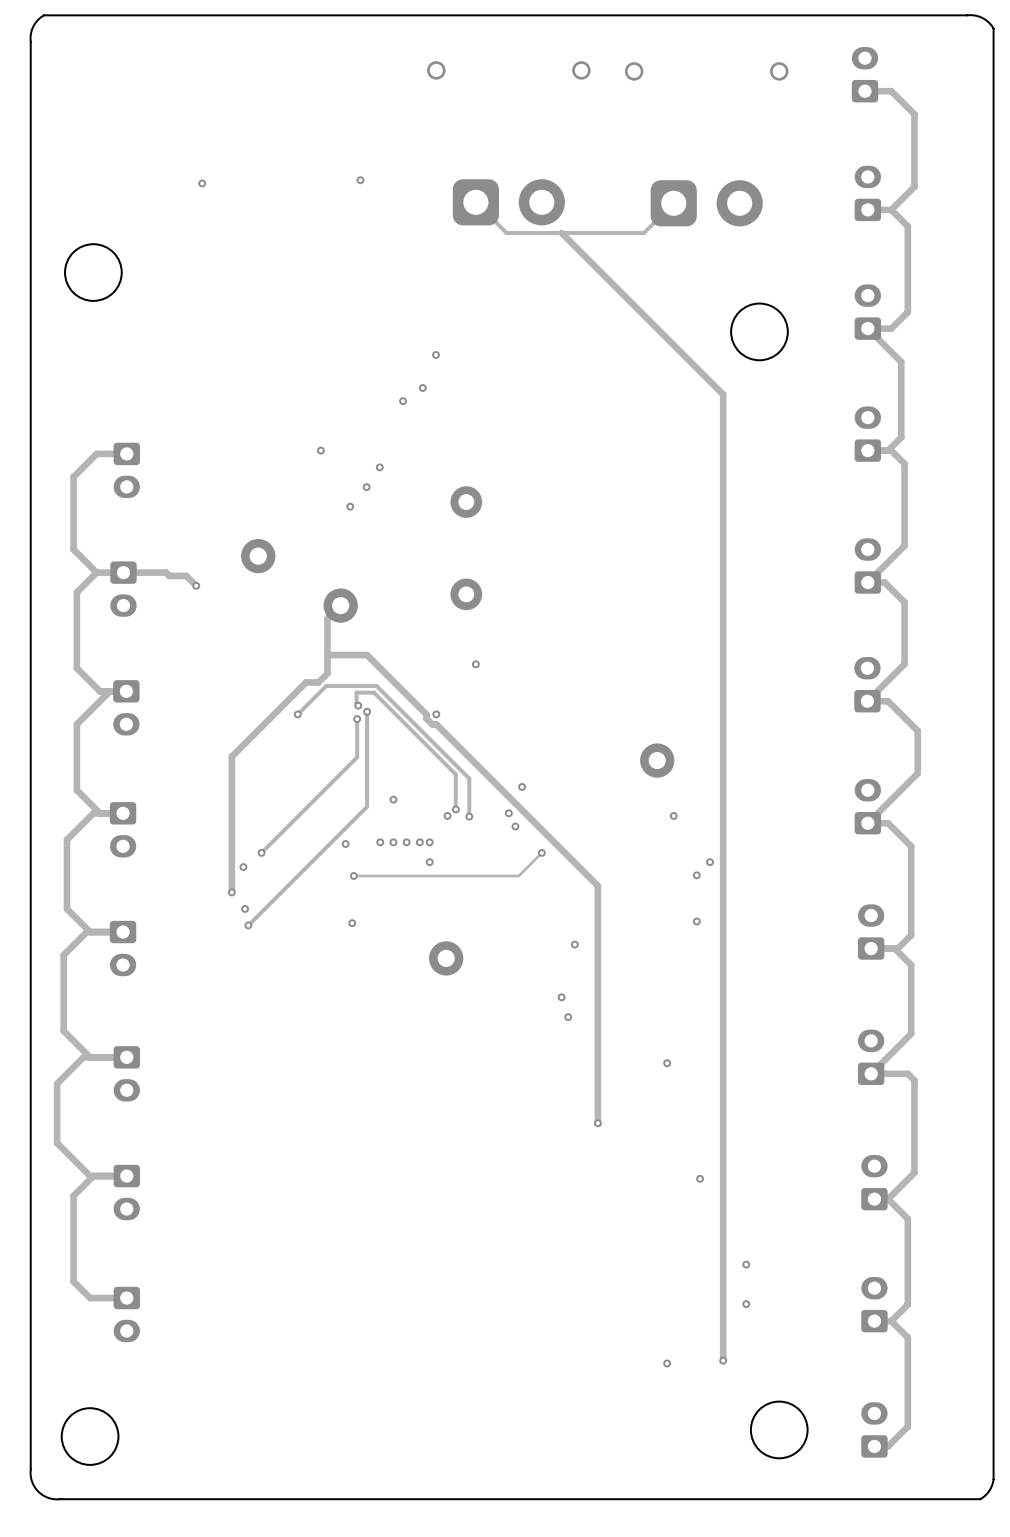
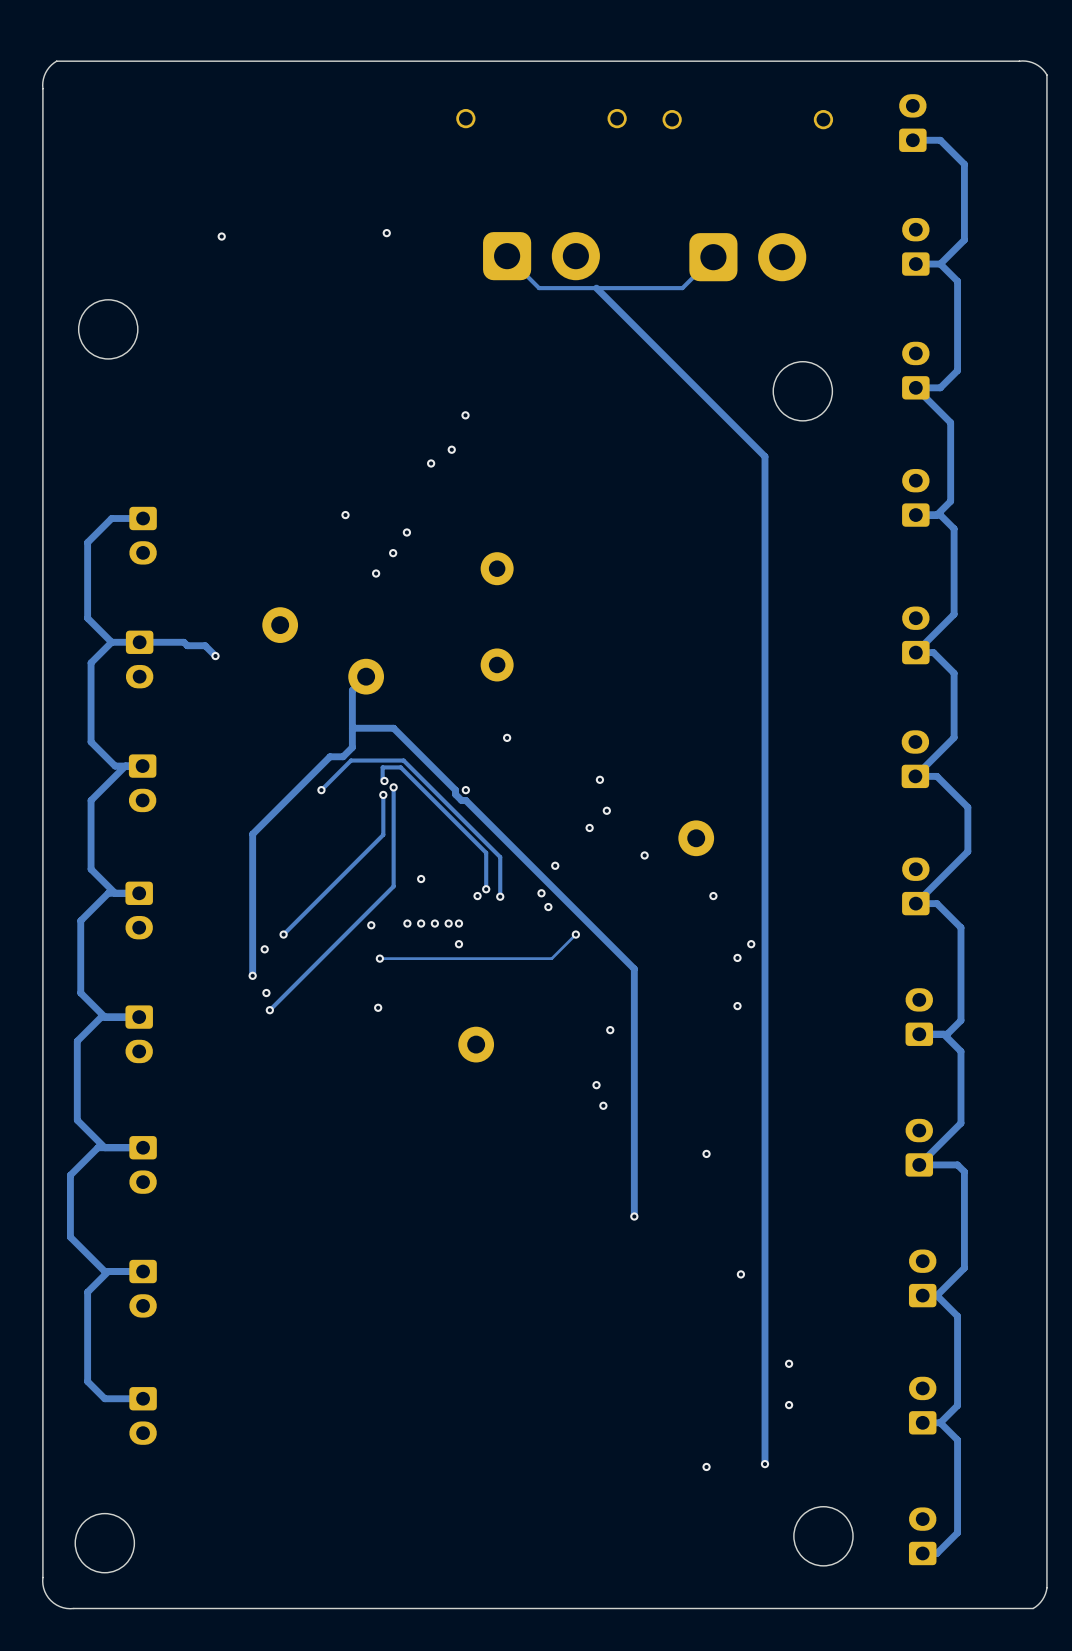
via: none -> (599, 779)
via: none -> (606, 810)
via: none -> (589, 827)
via: none -> (644, 855)

